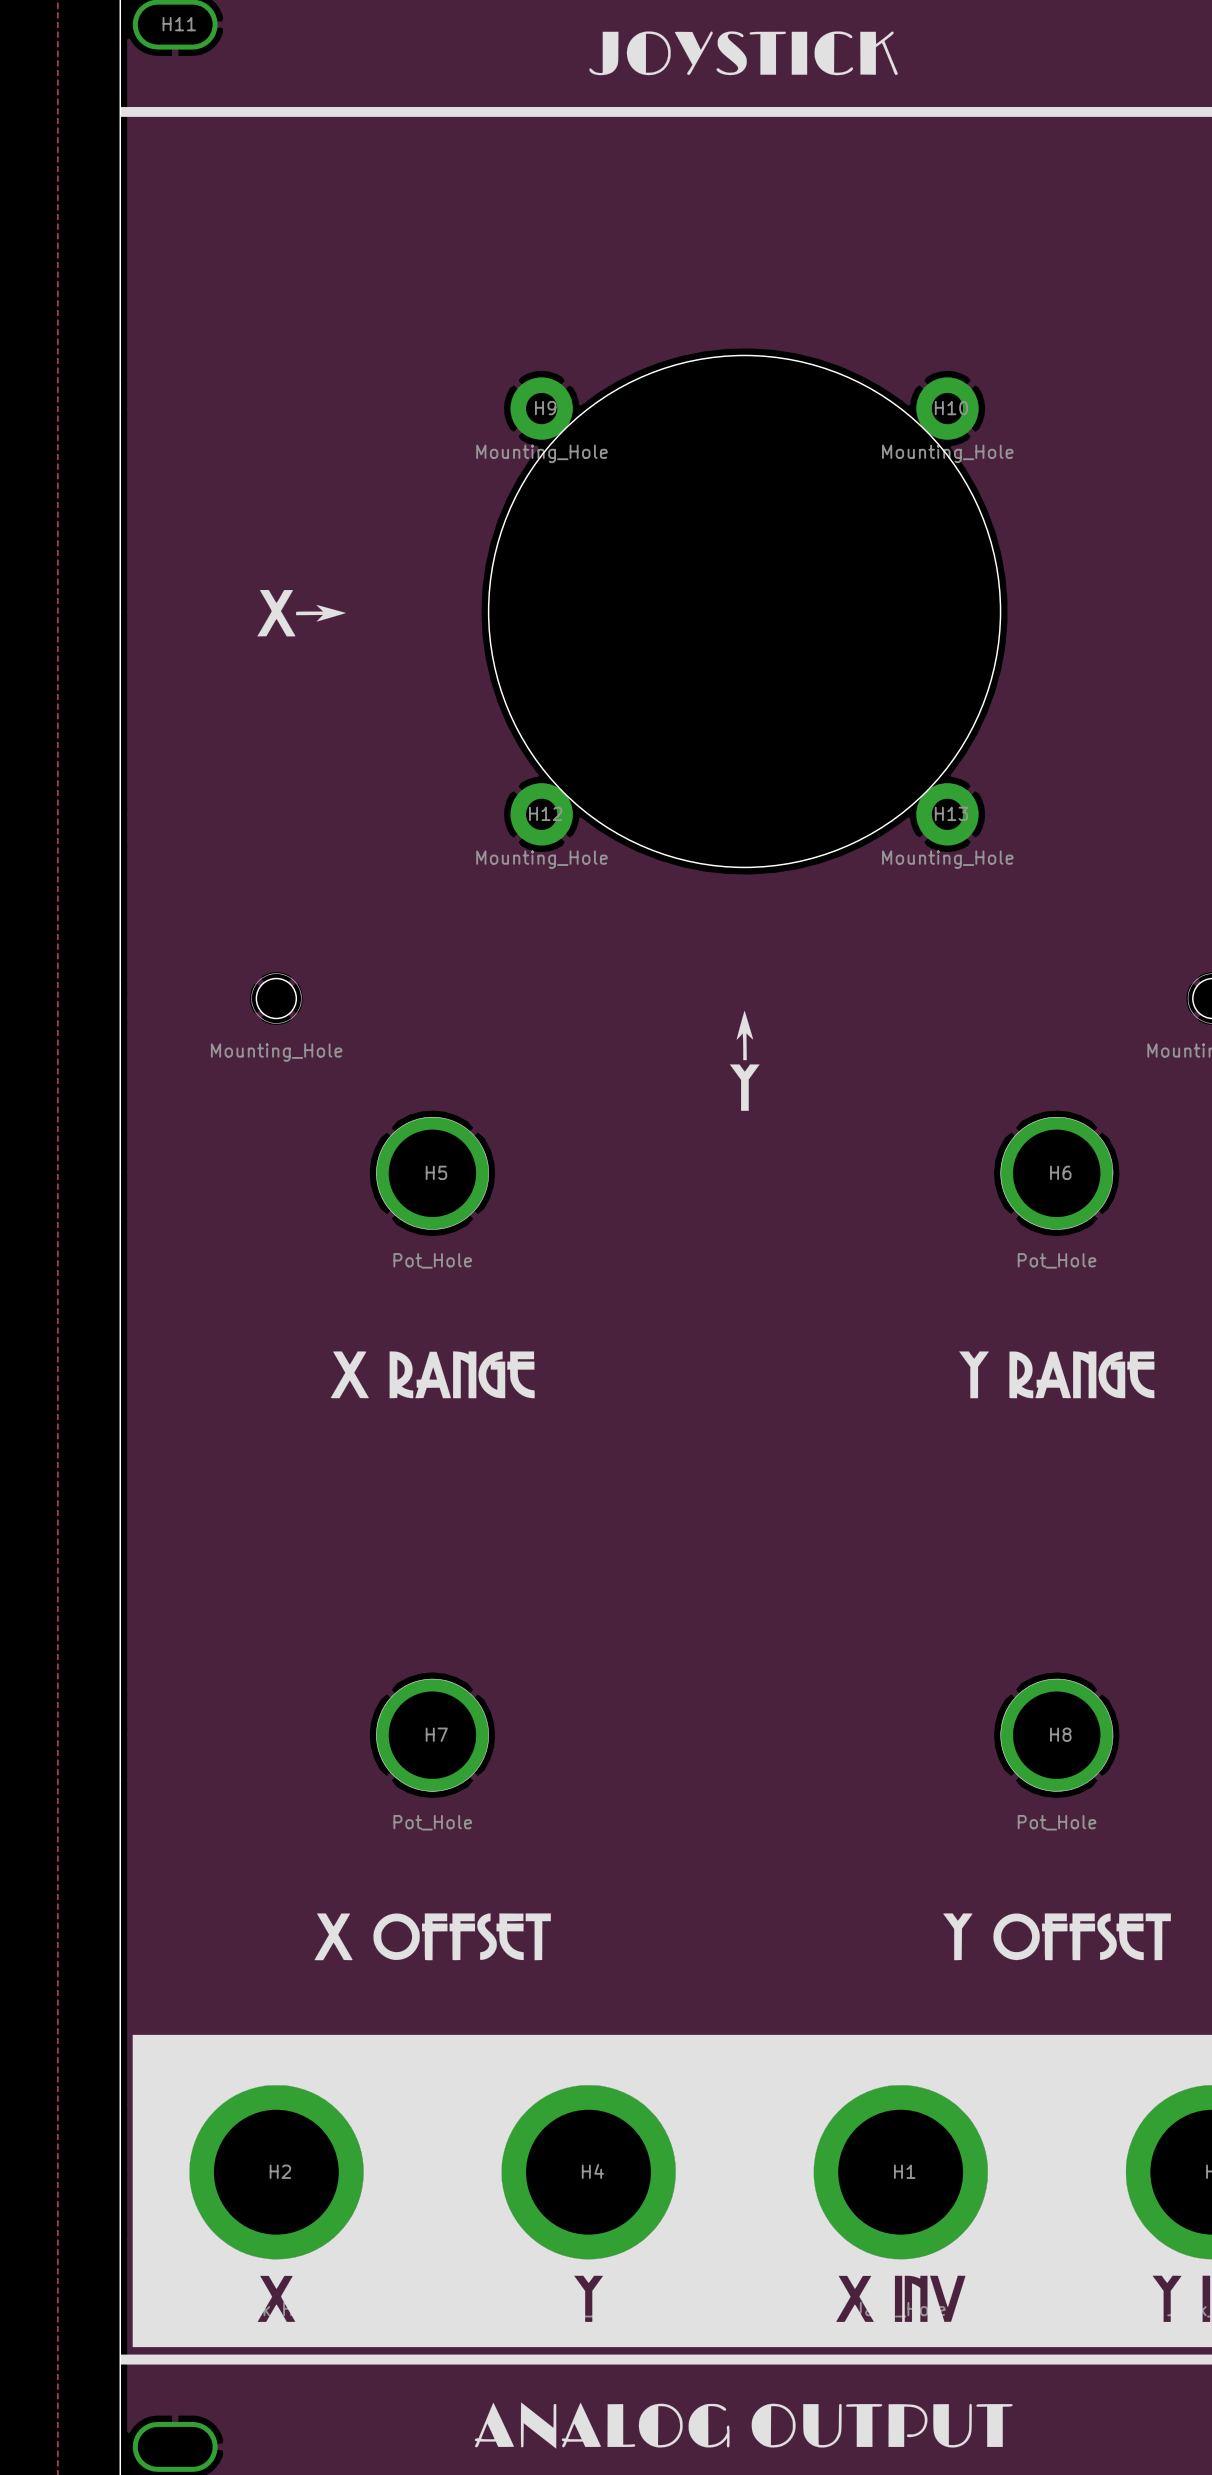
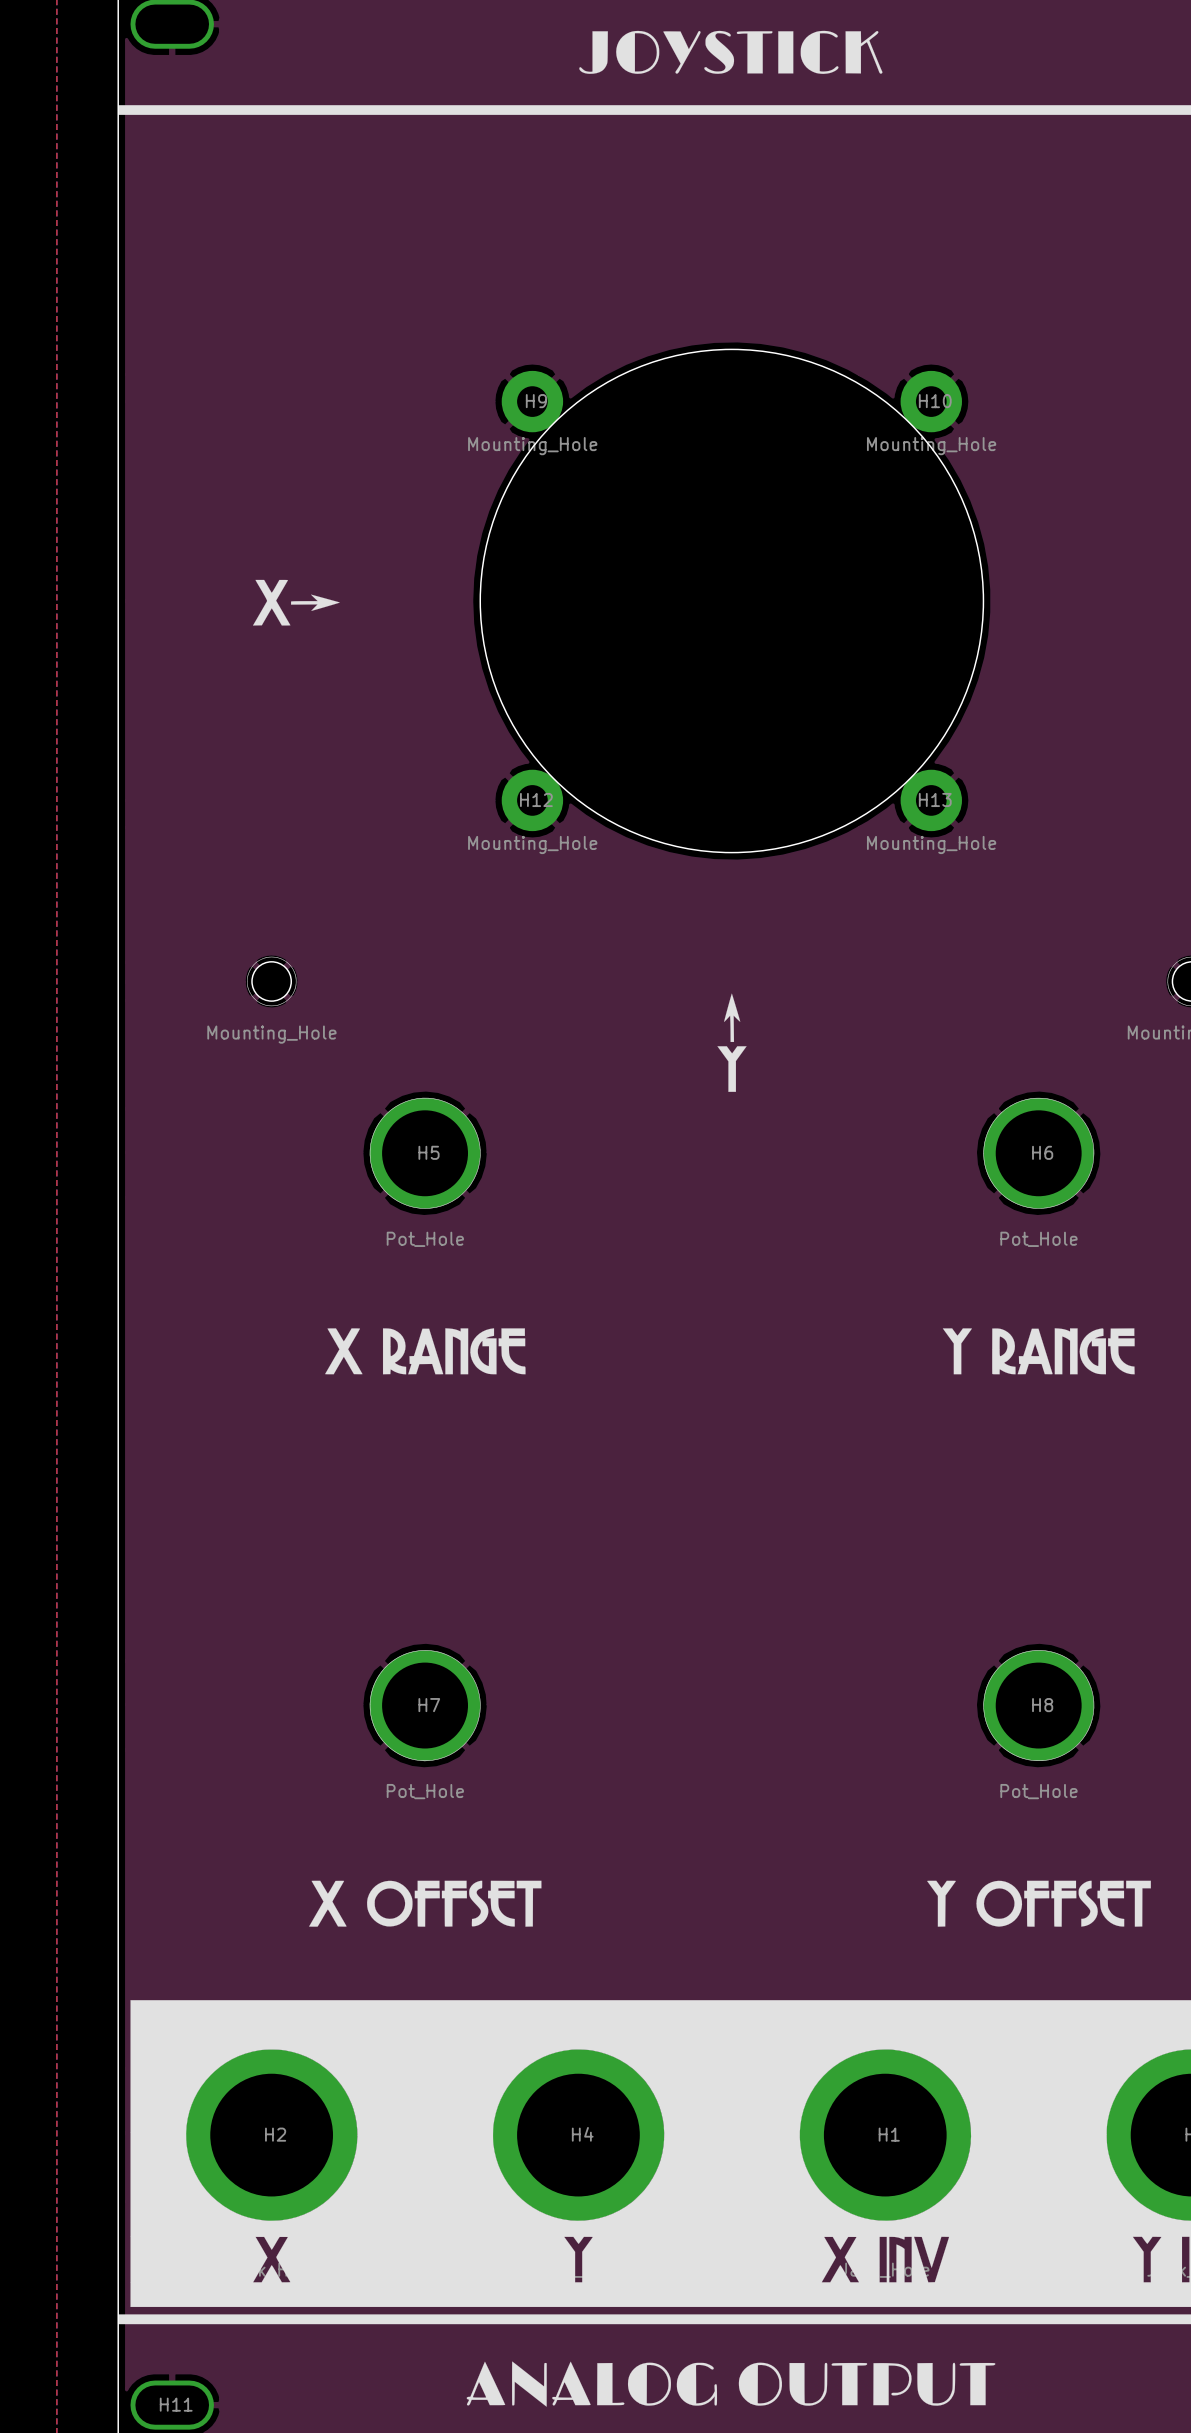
H11 name position: H11 (179, 24) -> H11 (176, 2404)

